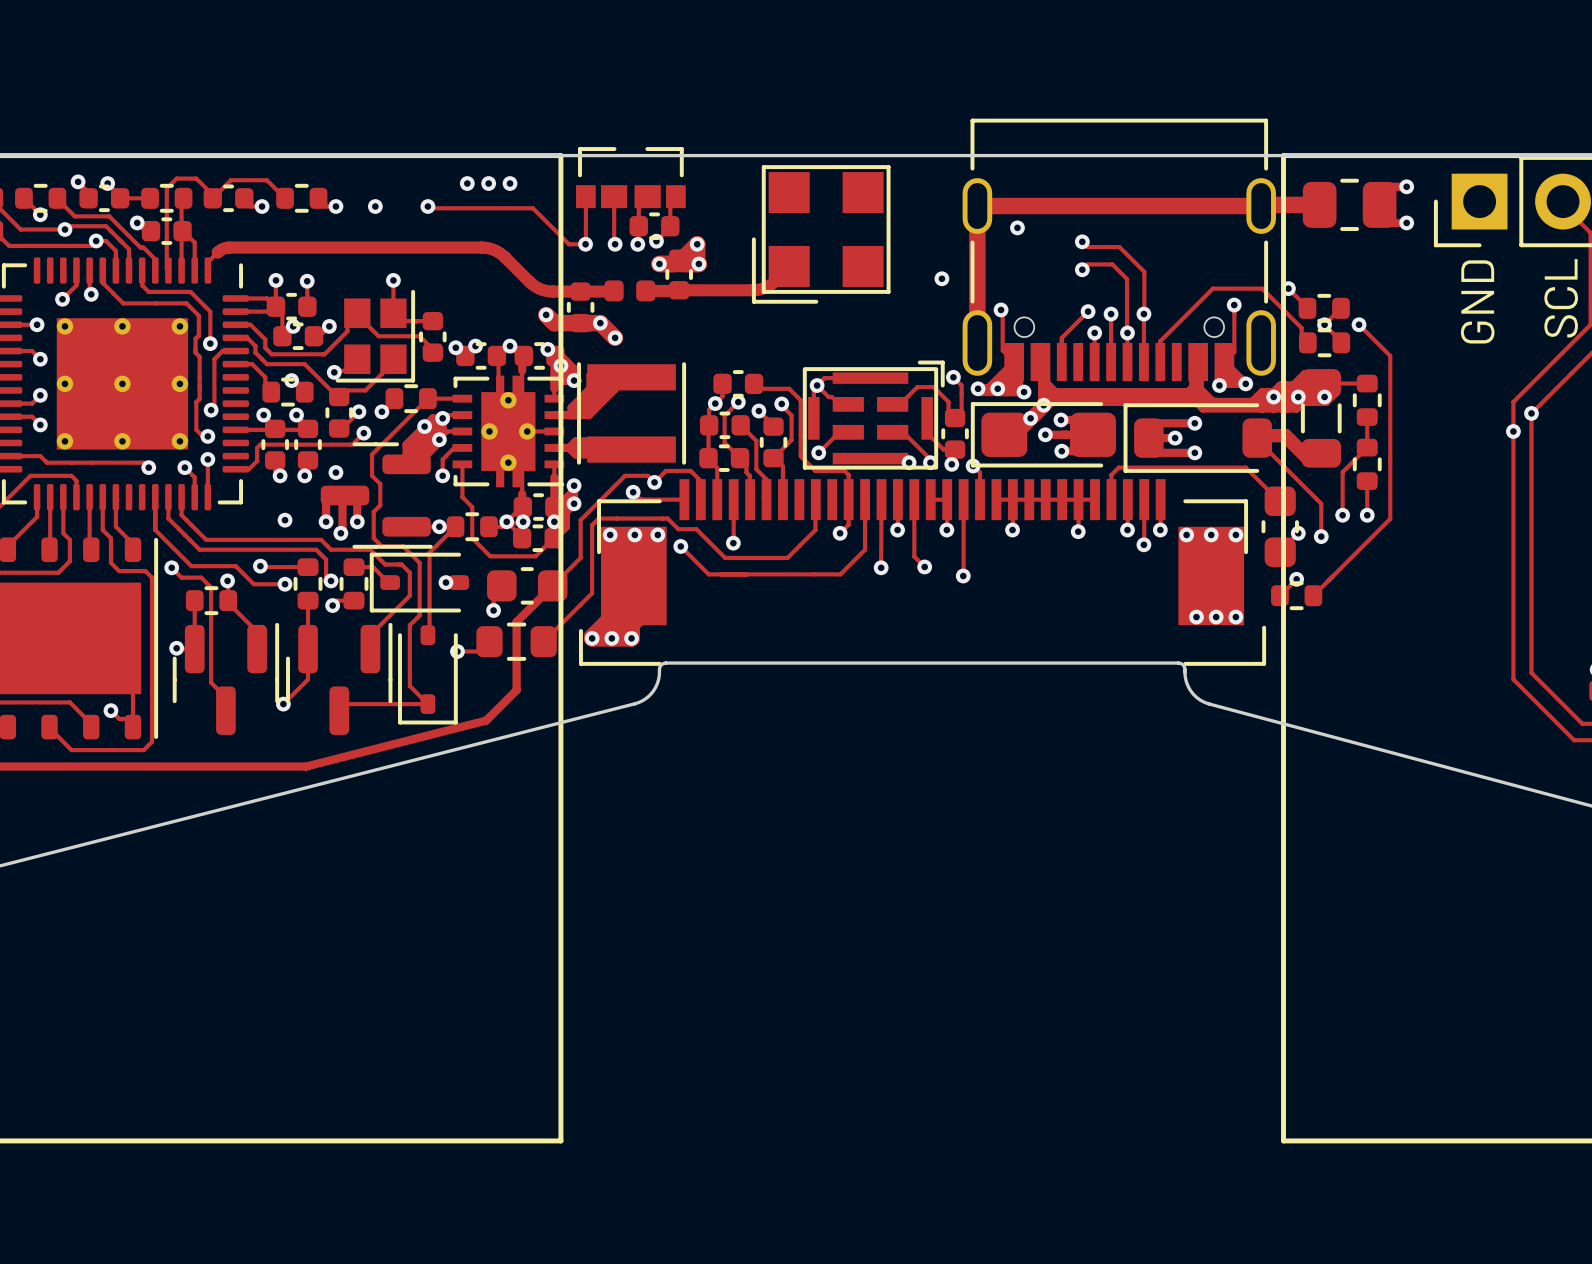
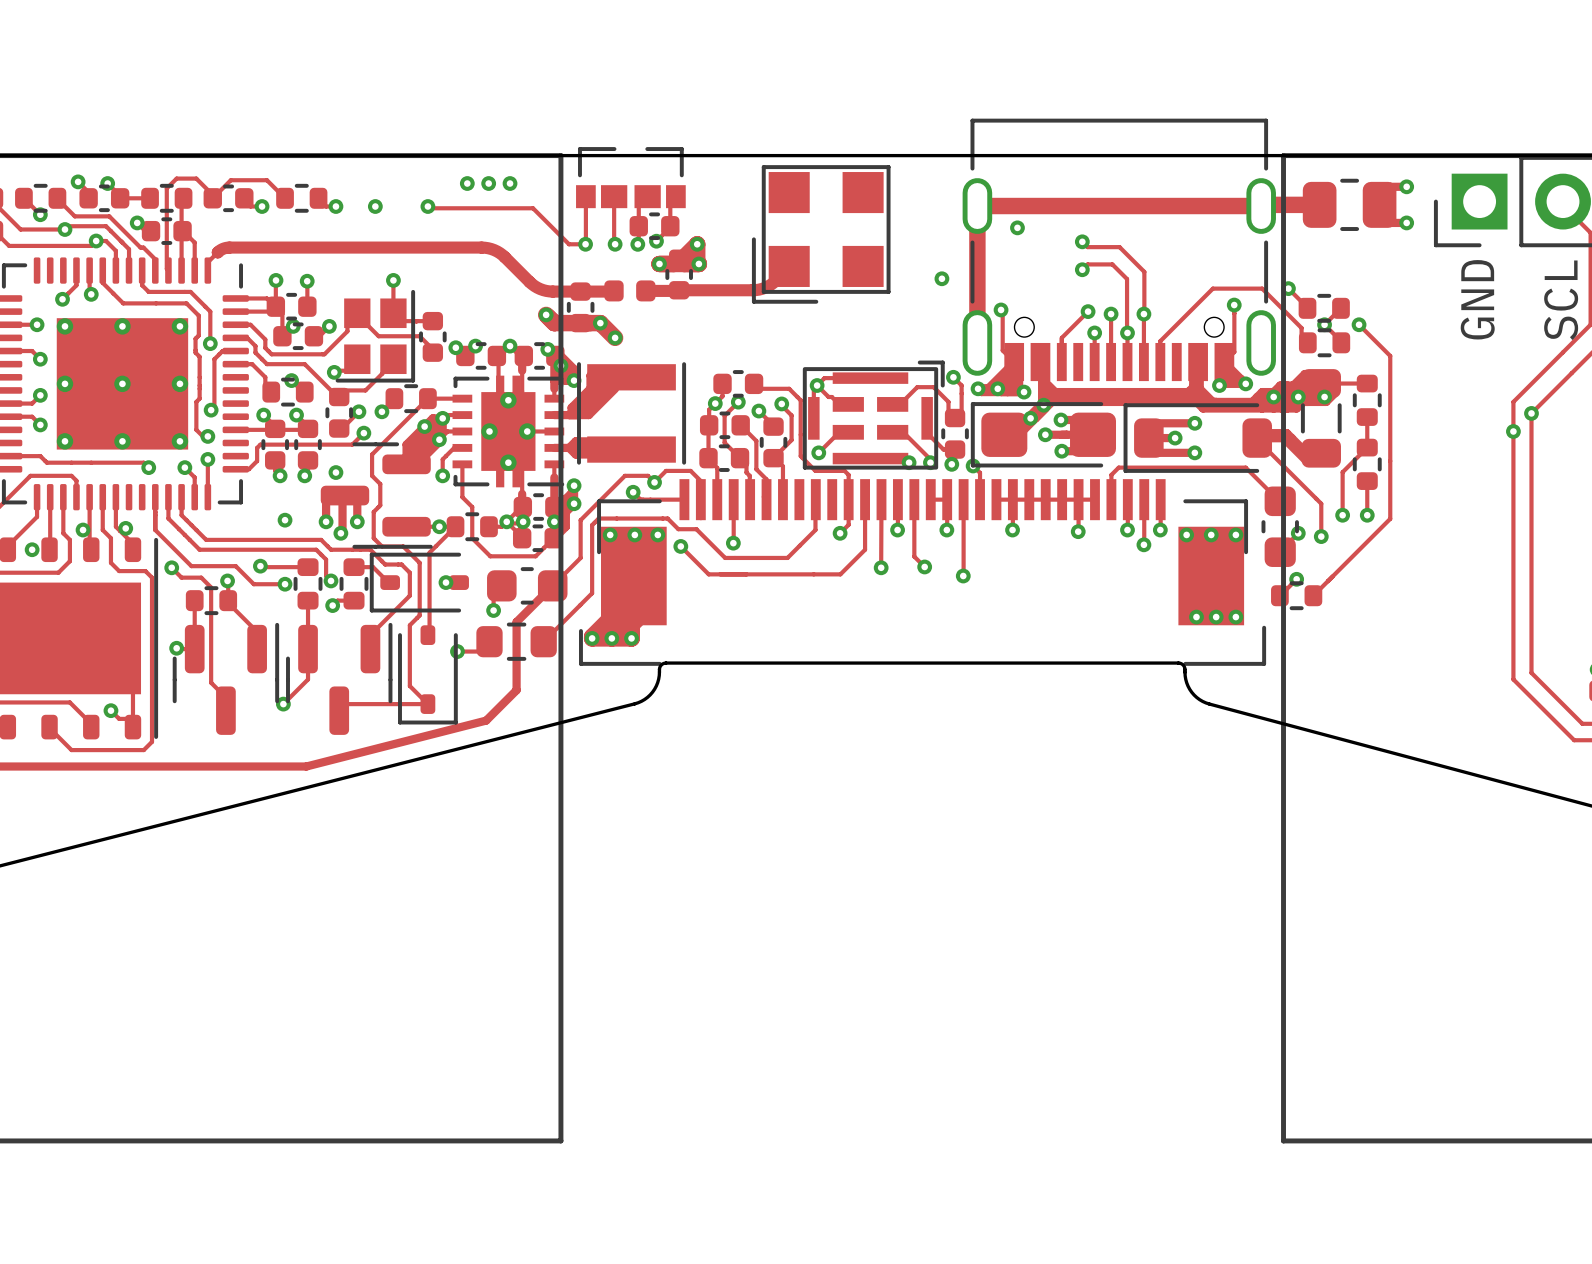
via: none -> (125, 528)
via: none -> (83, 530)
via: none -> (32, 549)

